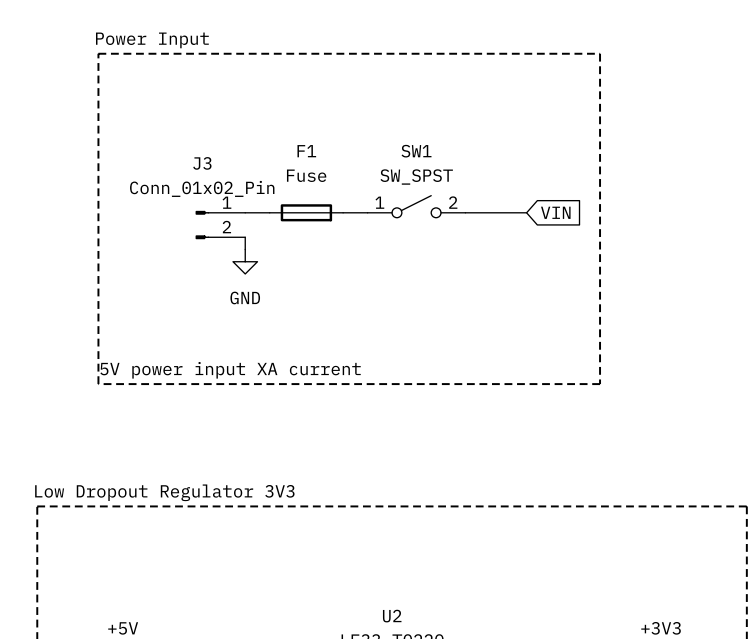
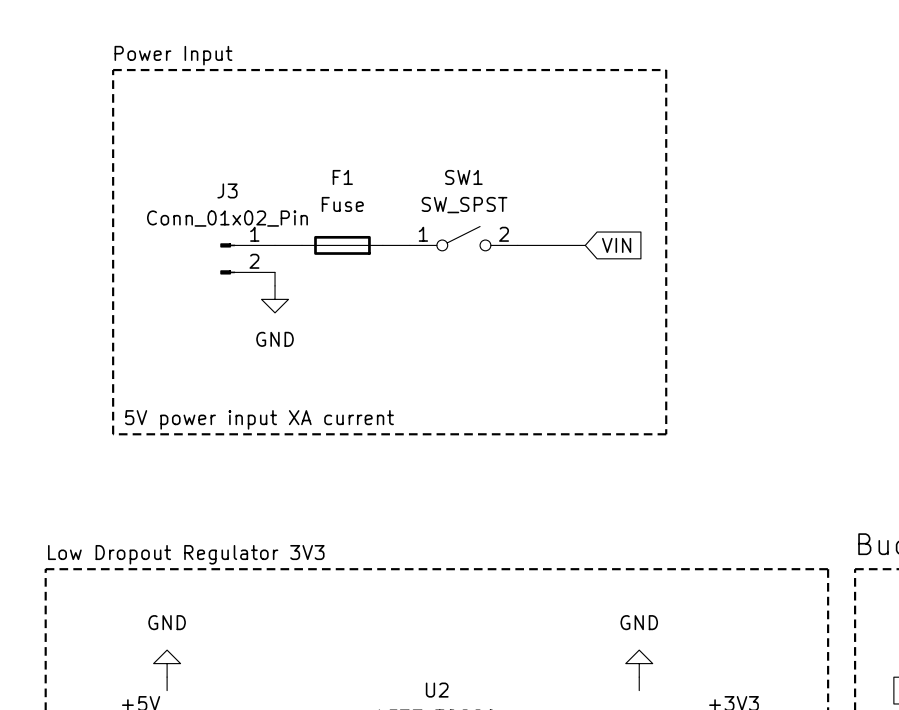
power symbol: none -> GND (167, 663)
power symbol: none -> GND (639, 663)
wire: none -> (167, 677) (167, 690)
wire: none -> (639, 677) (639, 690)

